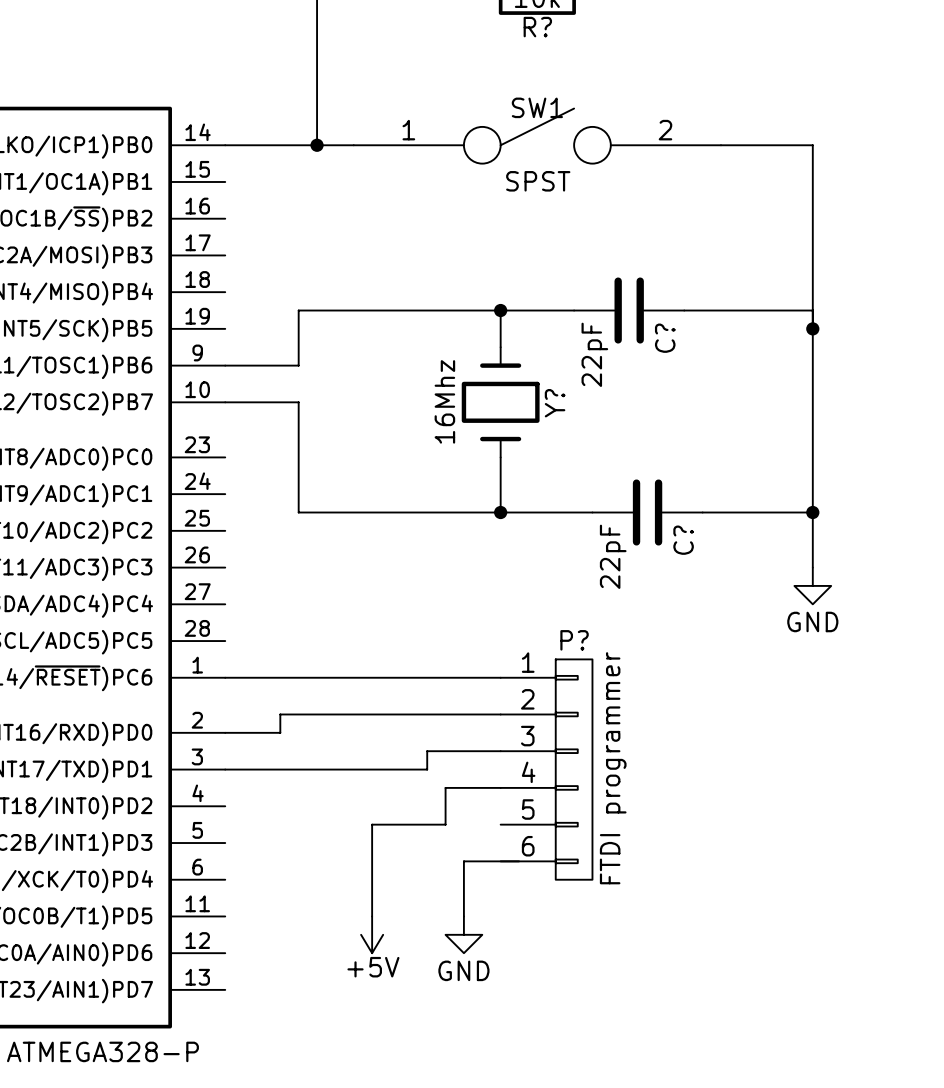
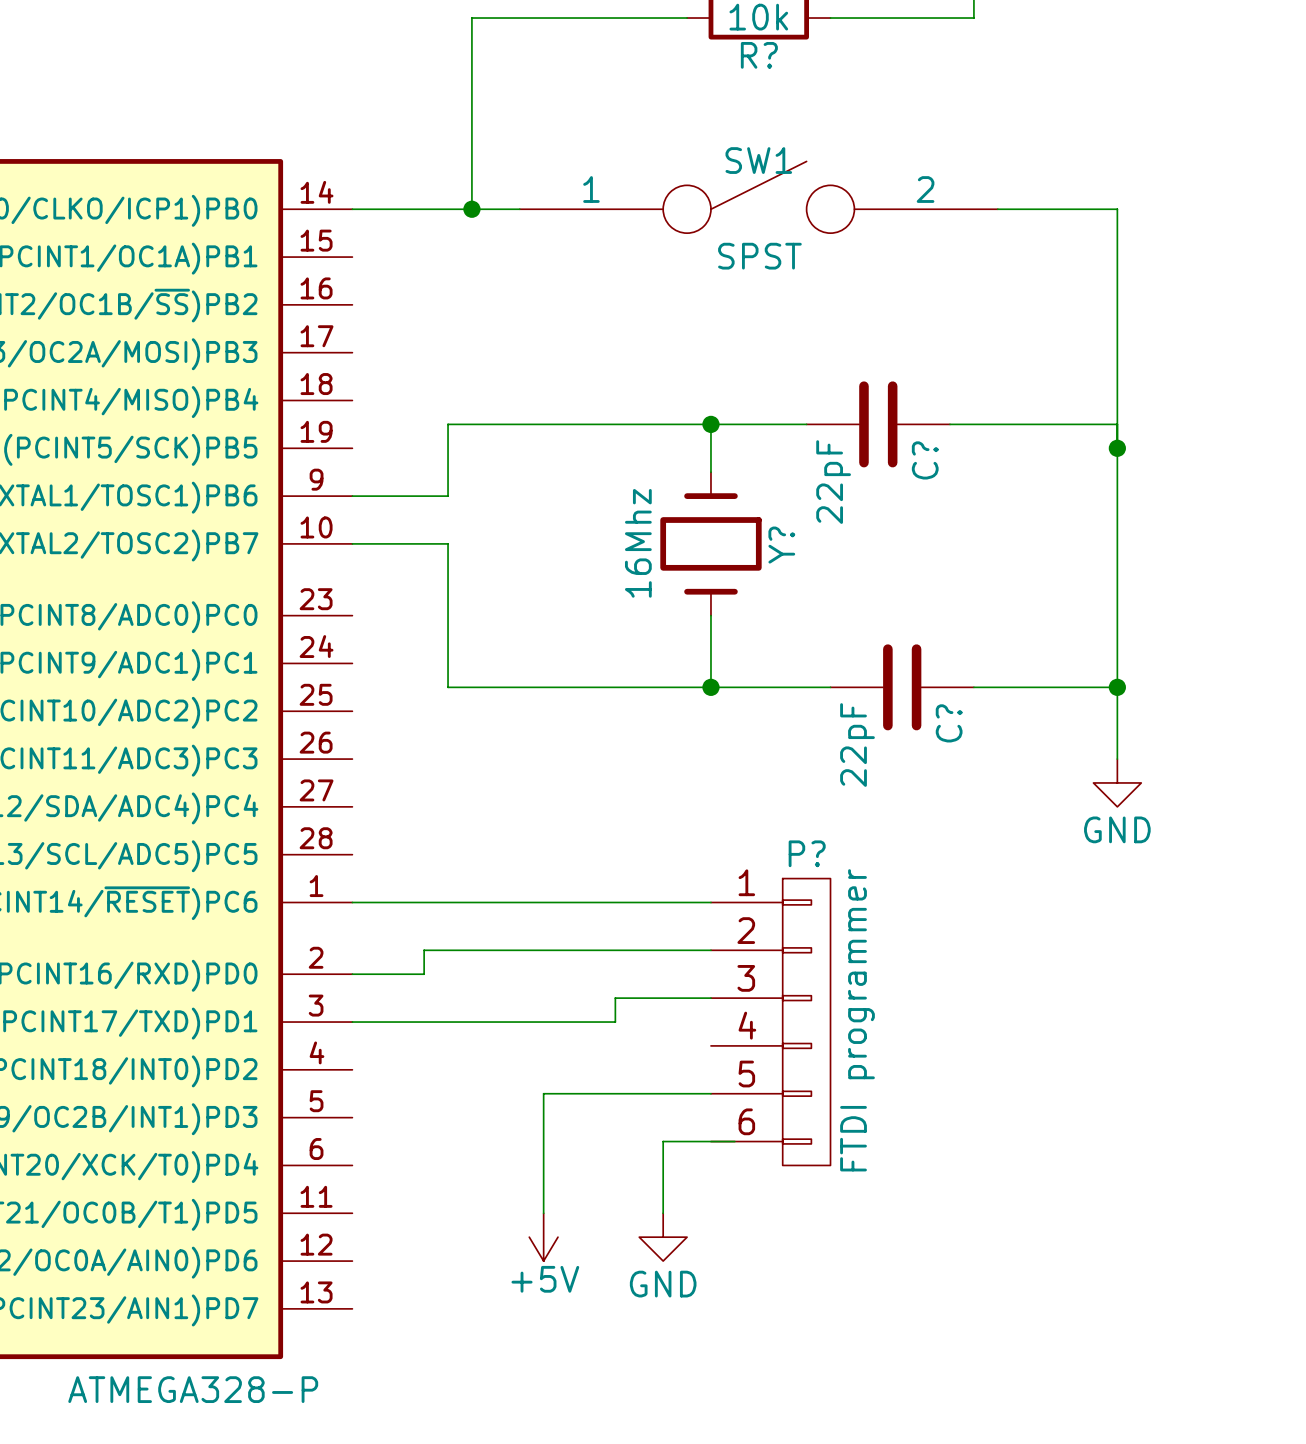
wire: (500, 787) (445, 787) (445, 824) -> (710, 1093) (639, 1093)

